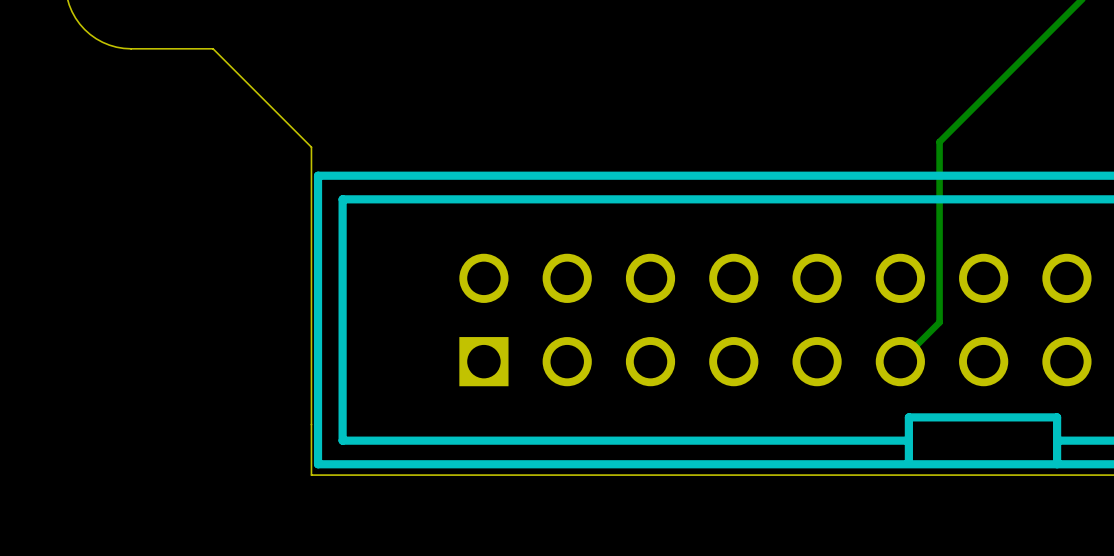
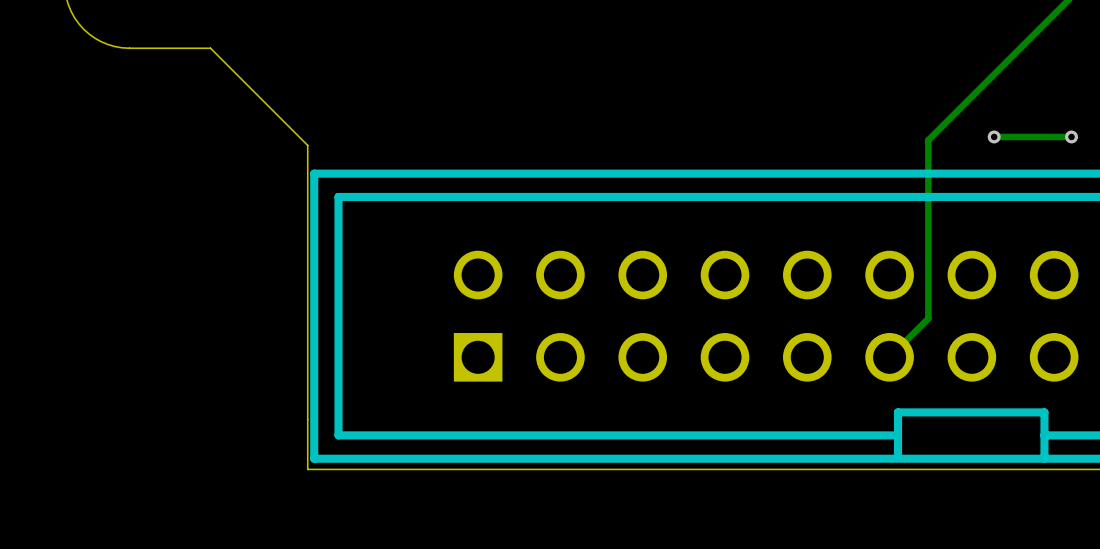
via: none -> (994, 136)
track: none -> (1071, 136) (994, 136)
via: none -> (1071, 136)

